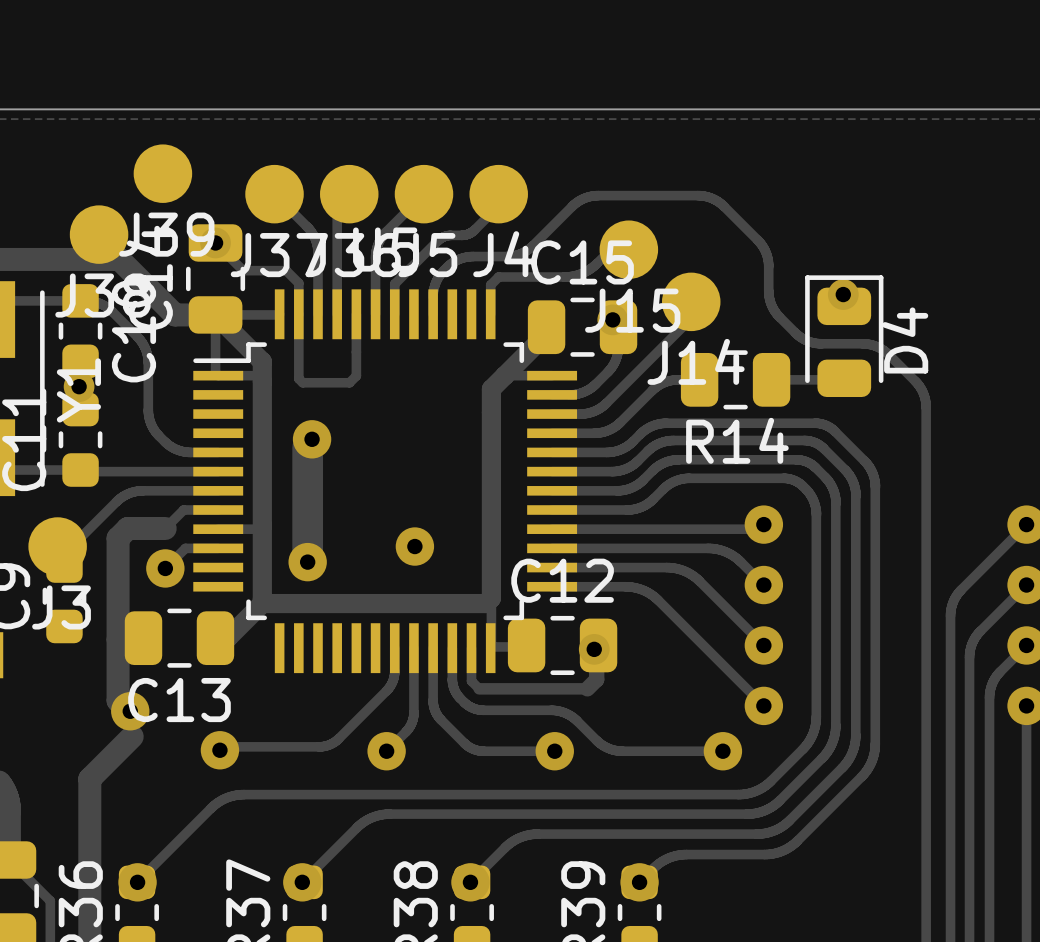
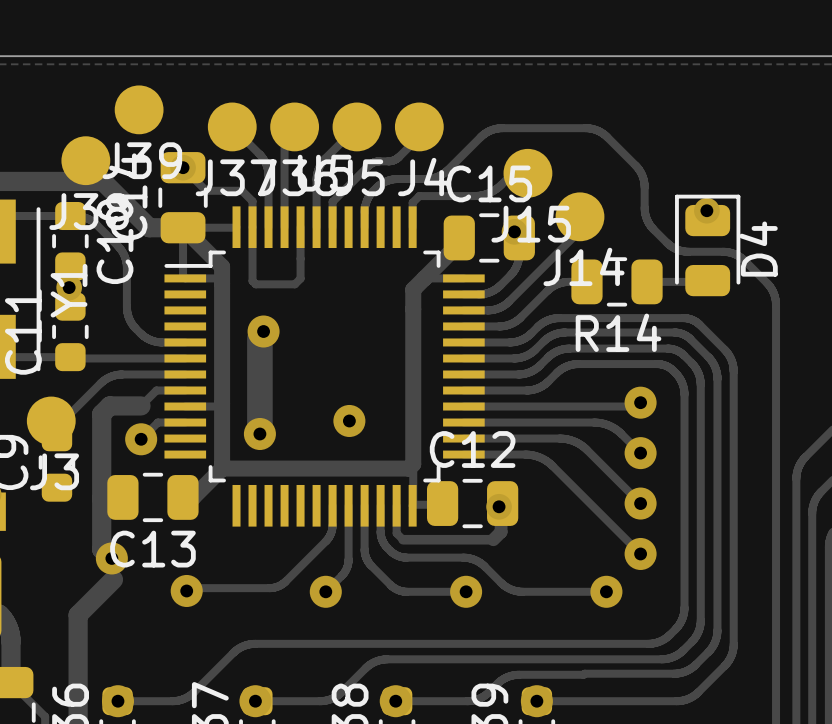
track: (816, 511) (815, 725) (811, 736) (804, 747) (769, 782) (760, 789) (738, 794) (237, 795) (224, 799) (212, 806) (137, 882) -> (684, 394) (684, 610) (678, 625) (662, 640) (648, 643) (252, 644) (235, 650) (193, 693) (184, 698) (173, 701) (117, 701)
track: (835, 725) (832, 743) (823, 756) (778, 802) (760, 812) (747, 814) (382, 814) (369, 818) (360, 824) (302, 882) -> (700, 570) (700, 621) (698, 630) (693, 639) (683, 650) (670, 657) (384, 659) (368, 665) (339, 694) (328, 699) (255, 701)
track: (855, 735) (852, 752) (843, 766) (787, 822) (772, 831) (756, 834) (531, 834) (518, 838) (508, 844) (470, 882) -> (717, 578) (717, 631) (715, 640) (708, 652) (693, 666) (684, 671) (673, 673) (516, 674) (503, 679) (485, 695) (473, 700) (397, 701)
track: (875, 743) (872, 759) (864, 773) (788, 847) (766, 854) (675, 855) (658, 863) (639, 882) -> (733, 585) (733, 644) (731, 654) (725, 664) (692, 696) (678, 701) (536, 701)

